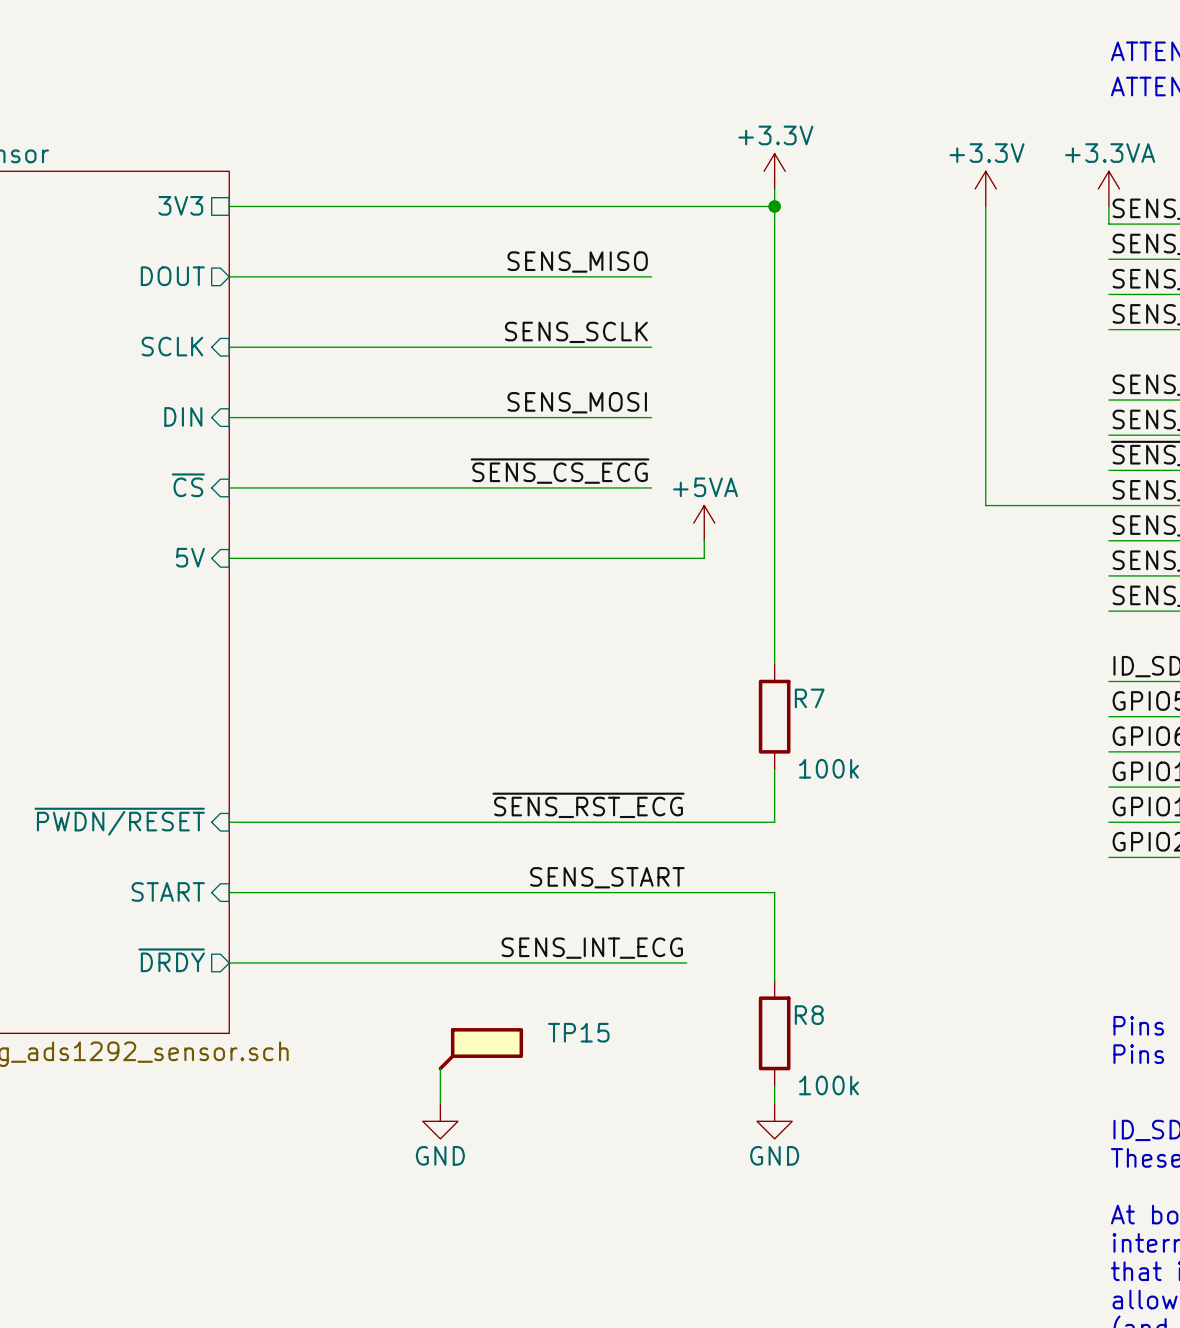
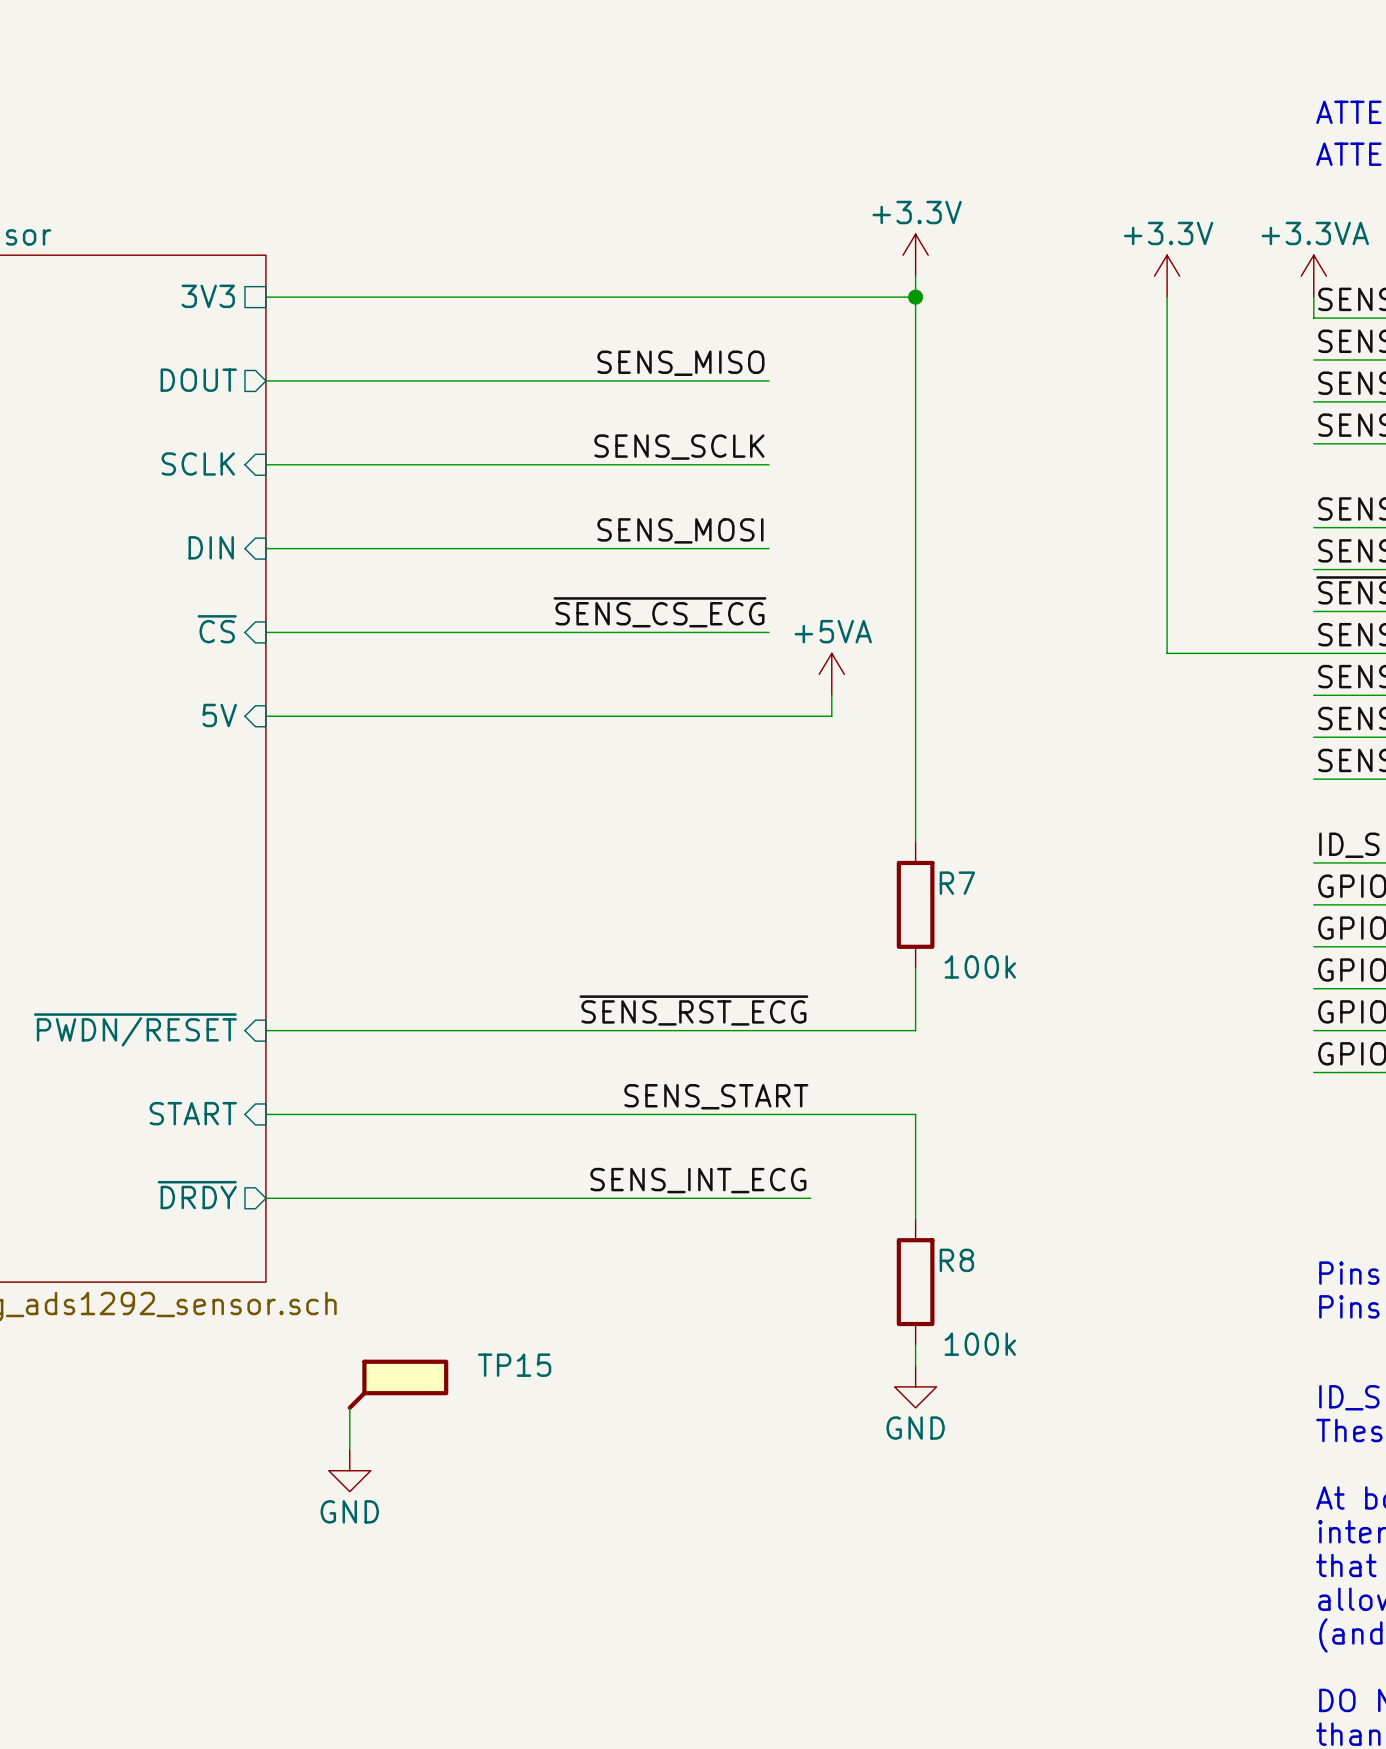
TP15 position: (480, 1049) -> (397, 1384)
wire: (440, 1068) (440, 1103) -> (349, 1407) (349, 1449)
power symbol position: GND (440, 1121) -> GND (349, 1470)

